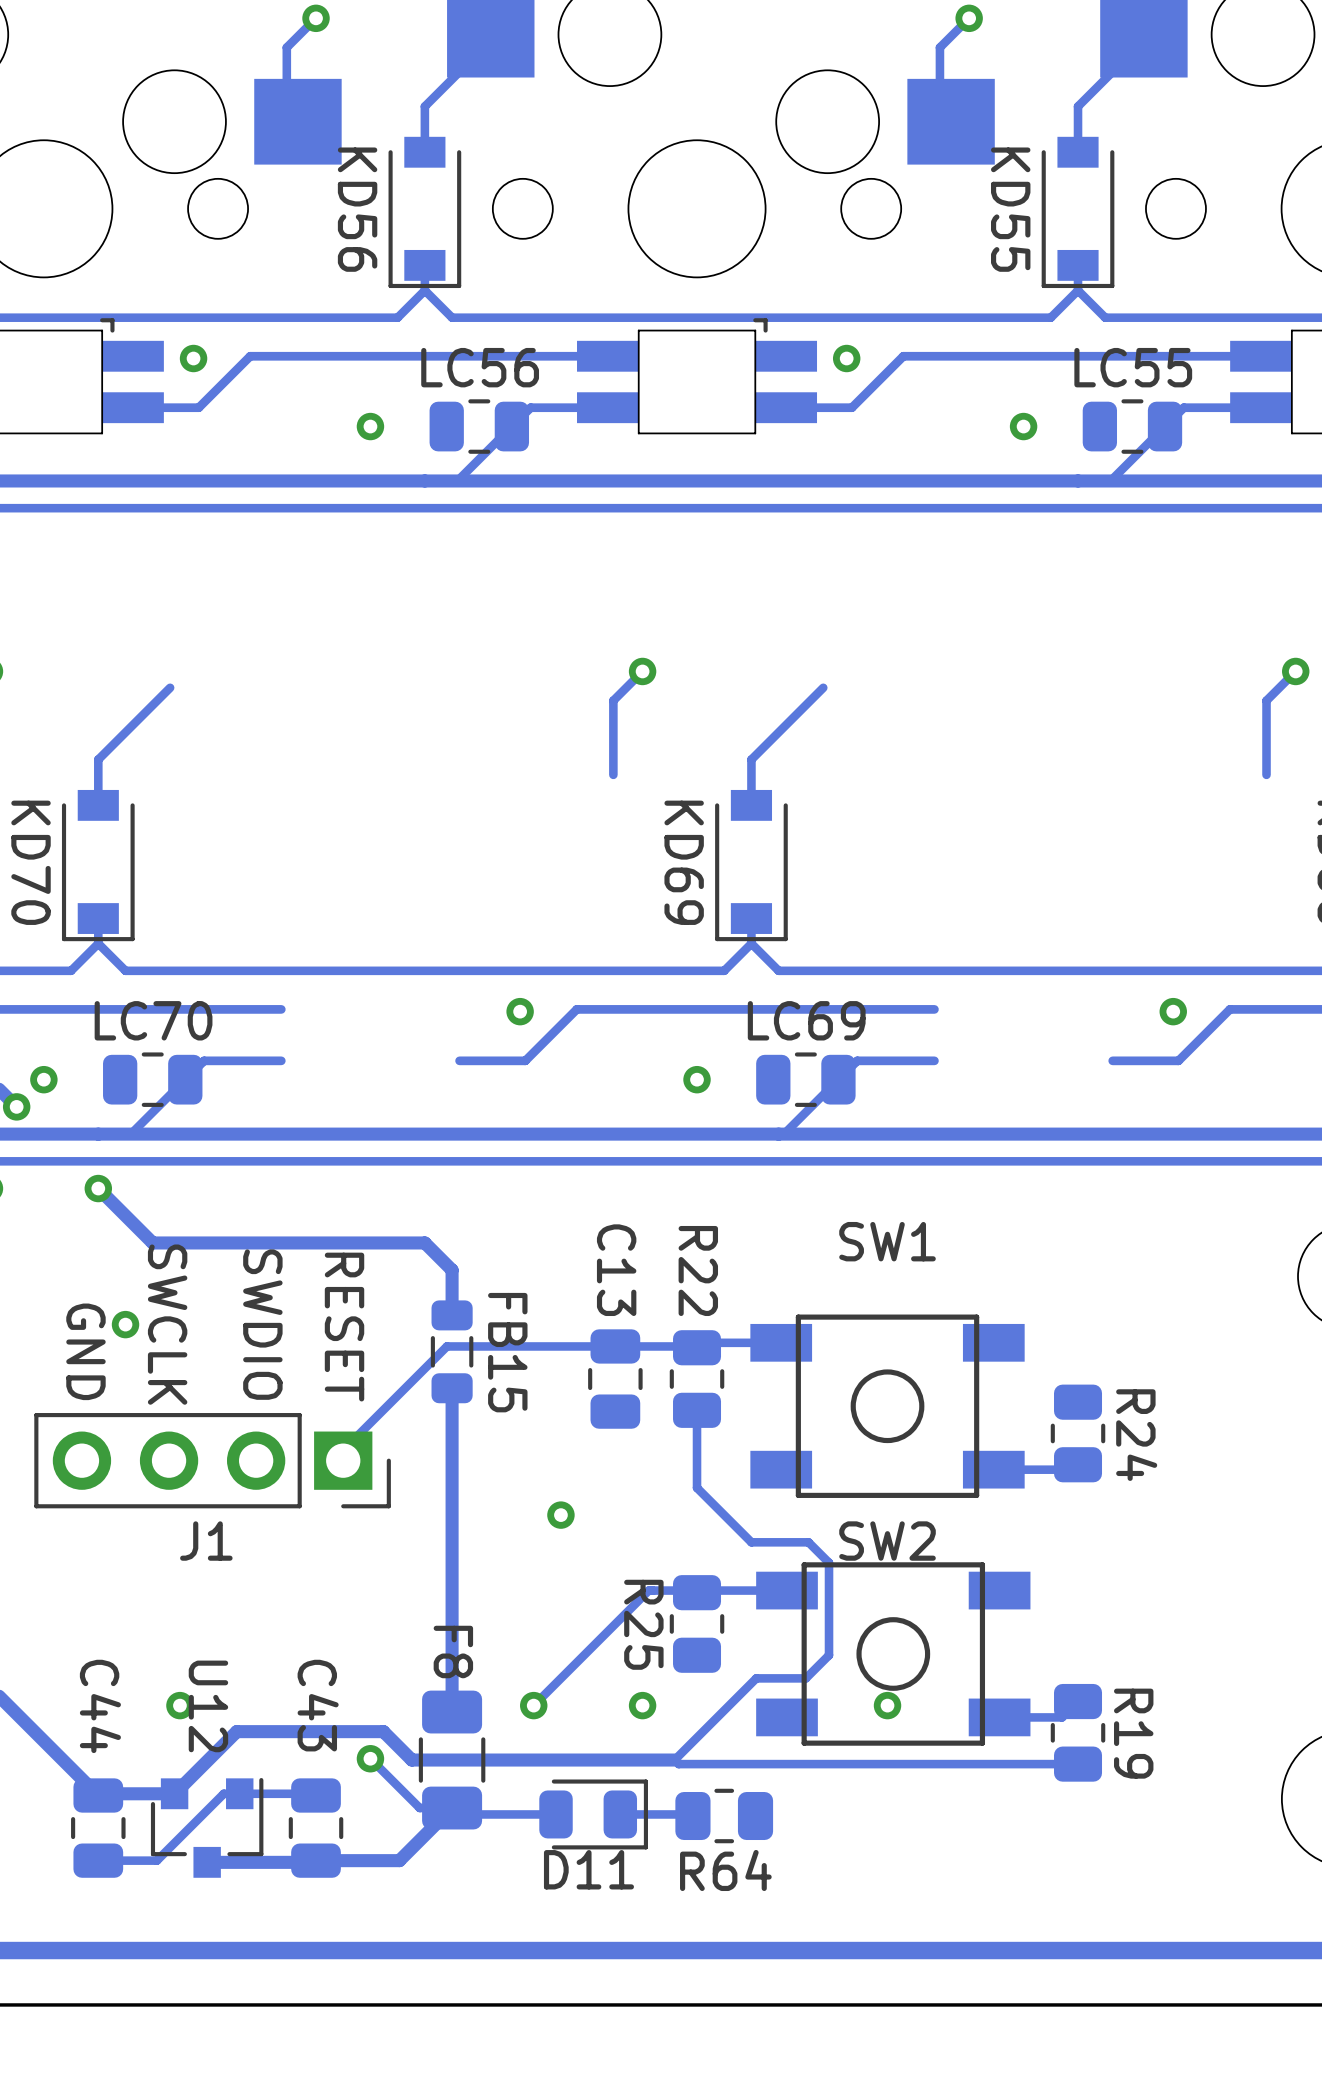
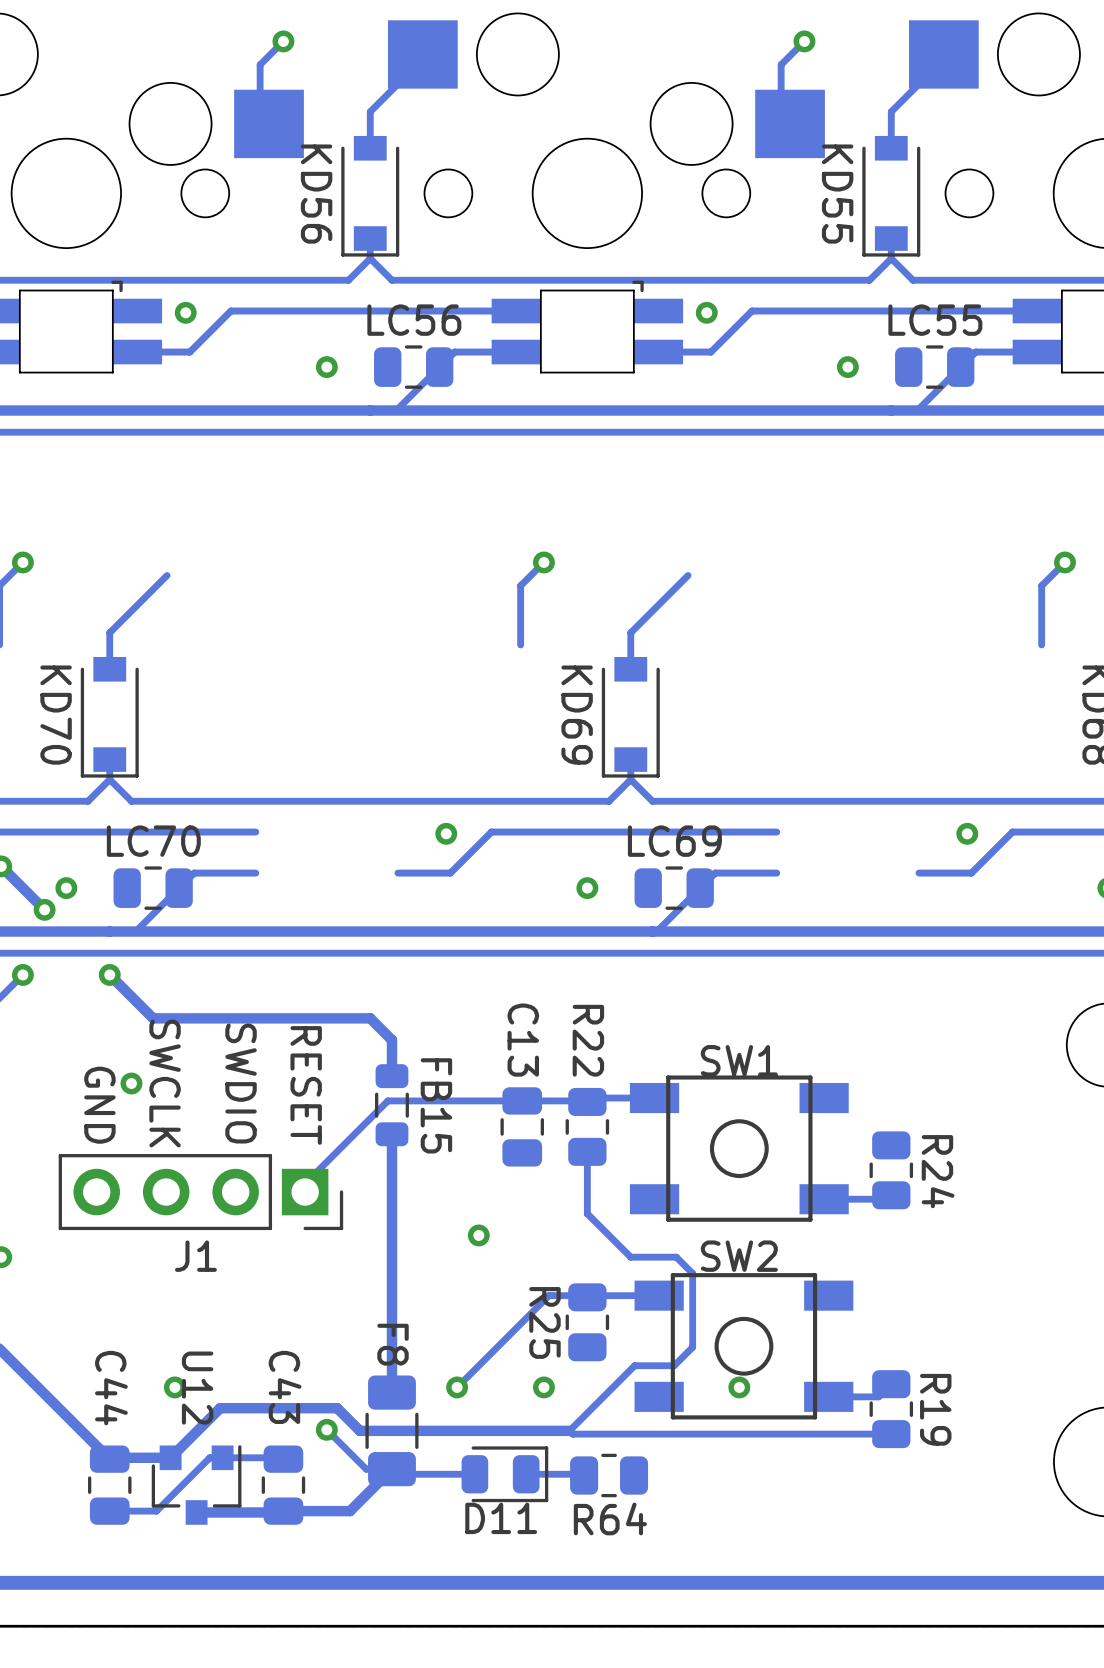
SW1 name position: SW1 (887, 1241) -> SW1 (739, 1060)

